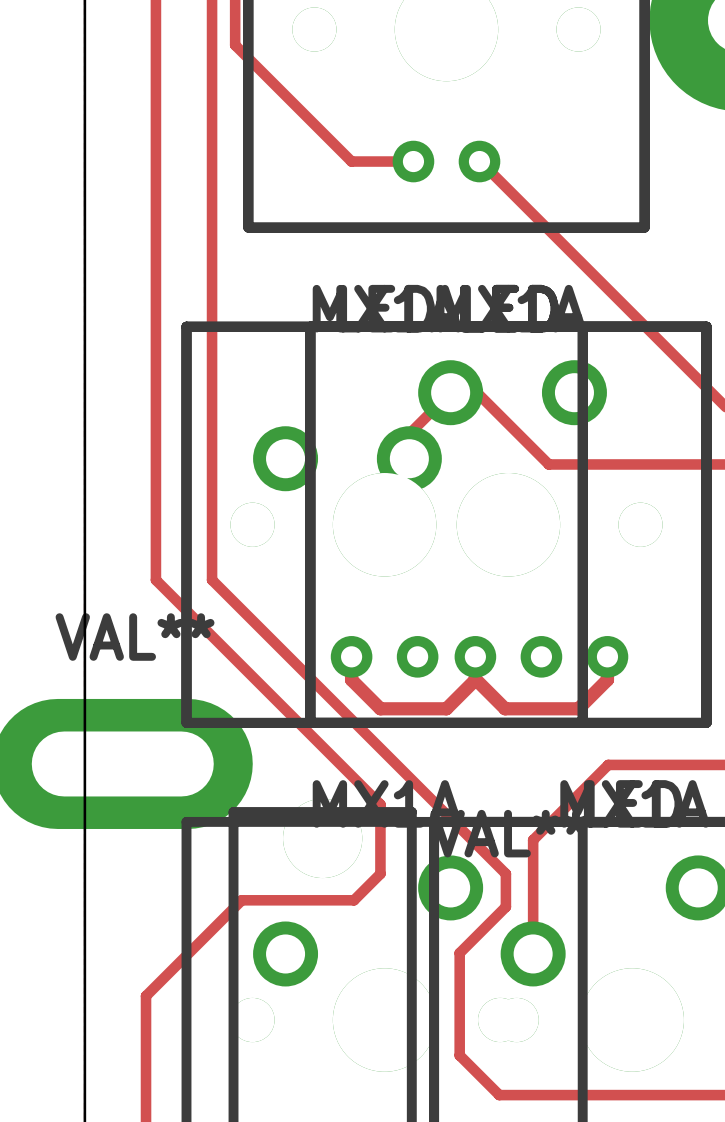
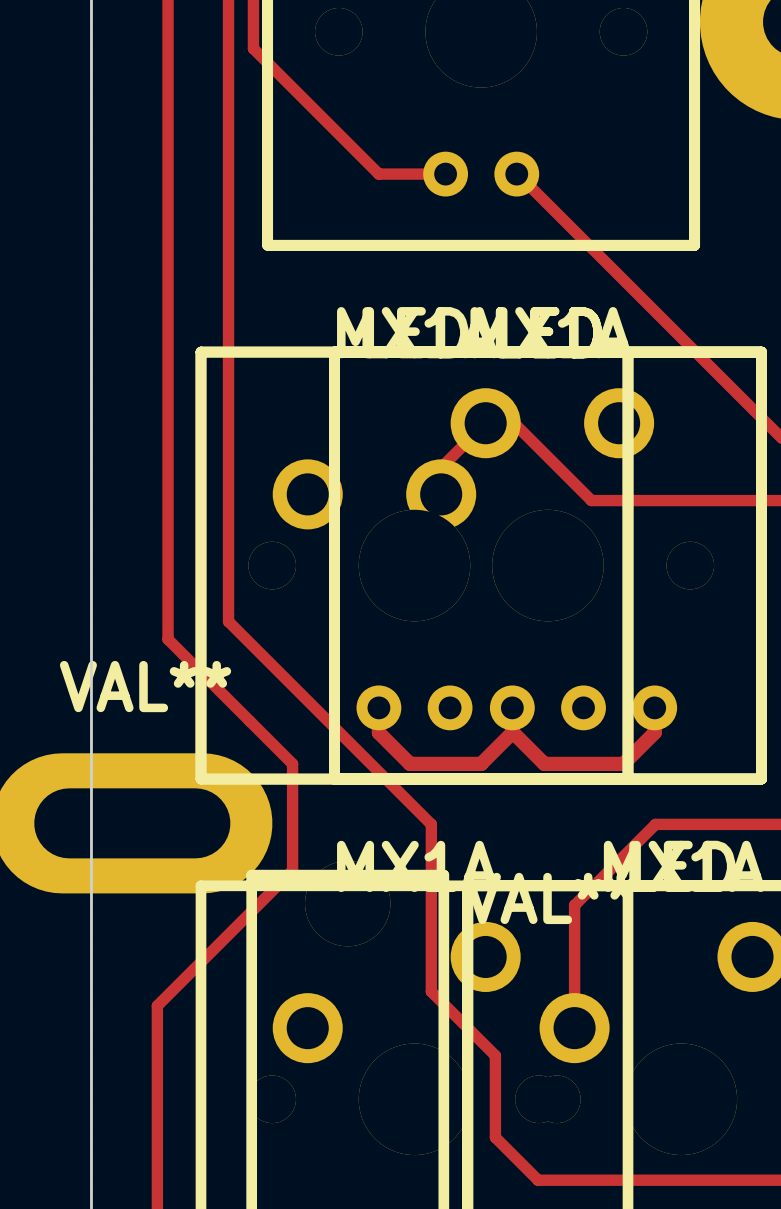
track: (212, 576) (212, 580) (505, 873) (505, 906) (459, 953) (459, 979) -> (228, 621) (431, 824) (431, 991) (495, 1055)
track: (155, 580) (380, 804) (380, 873) (354, 900) (241, 900) (146, 996) -> (168, 625) (168, 639) (292, 763) (292, 870) (157, 1005) (157, 1073)

